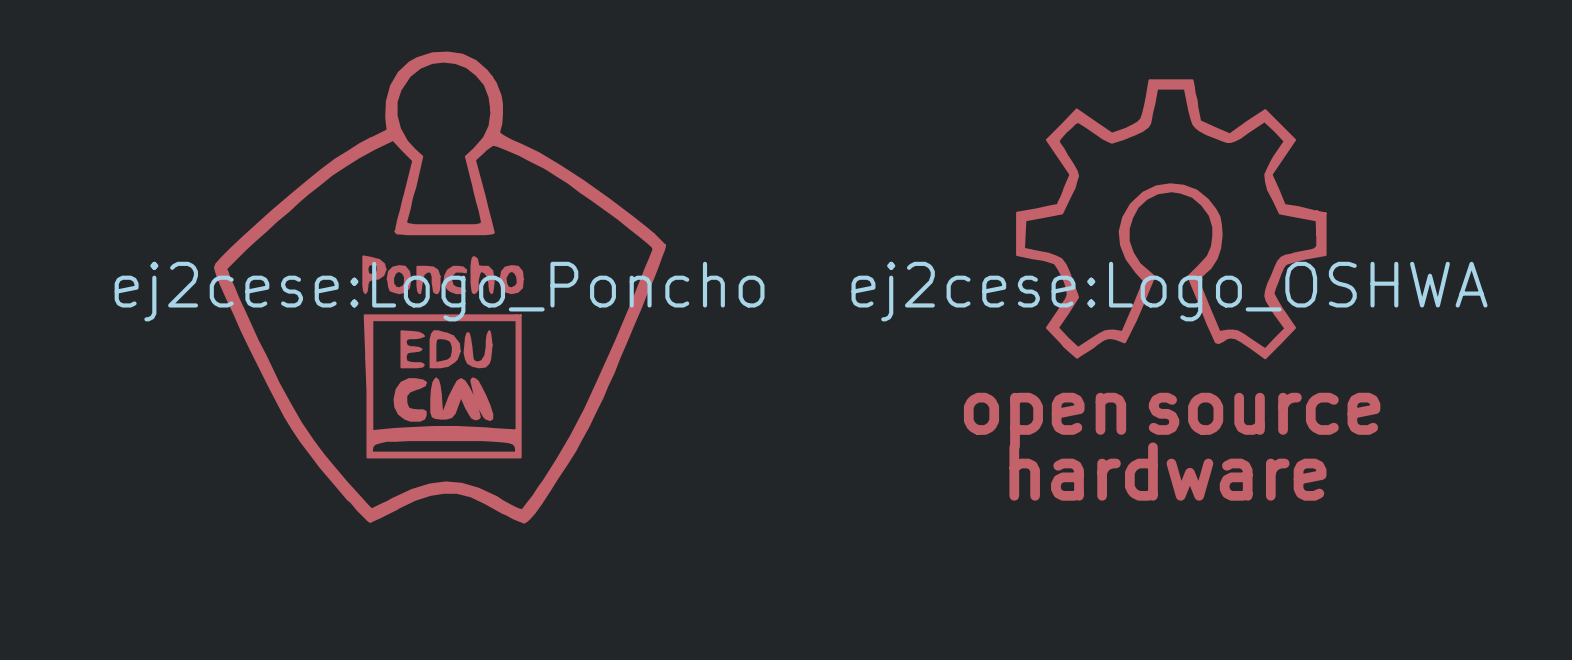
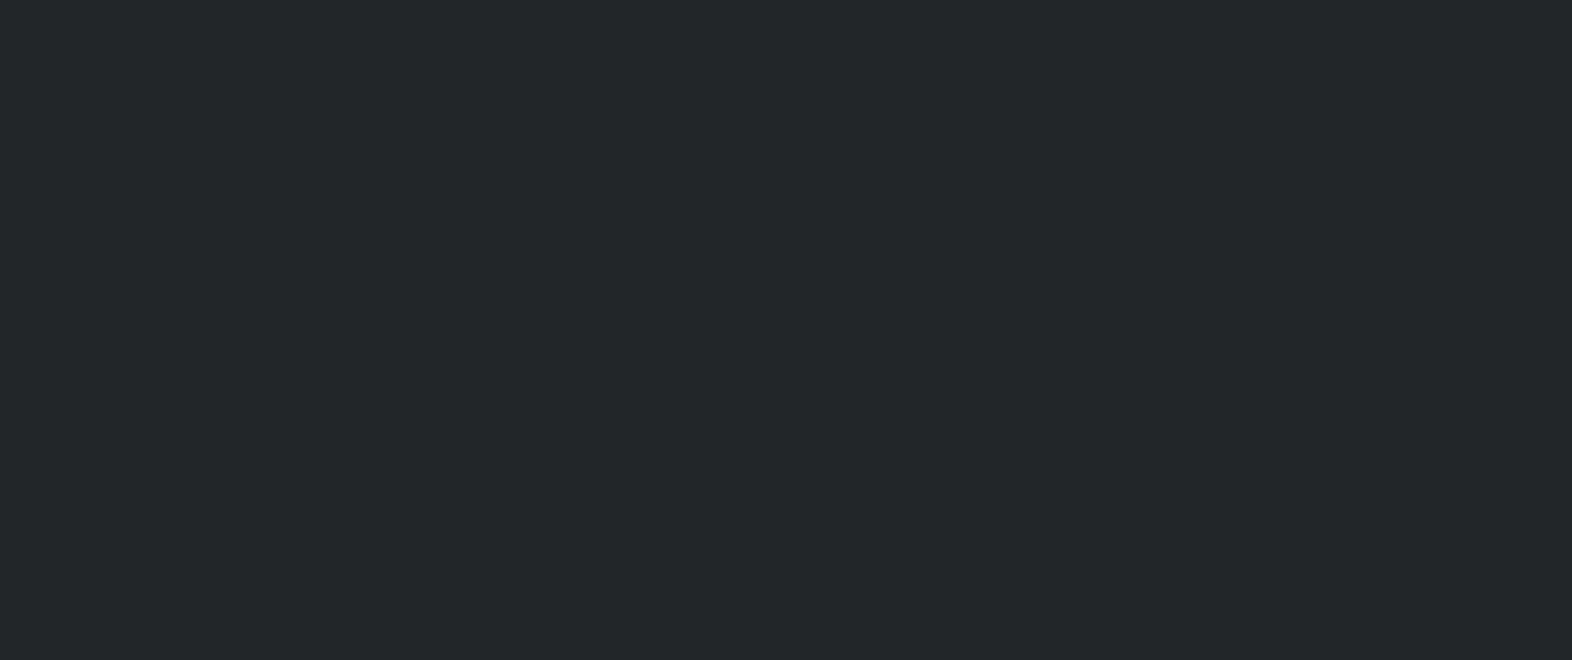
power symbol: (1171, 219) -> none
power symbol: (439, 287) -> none

